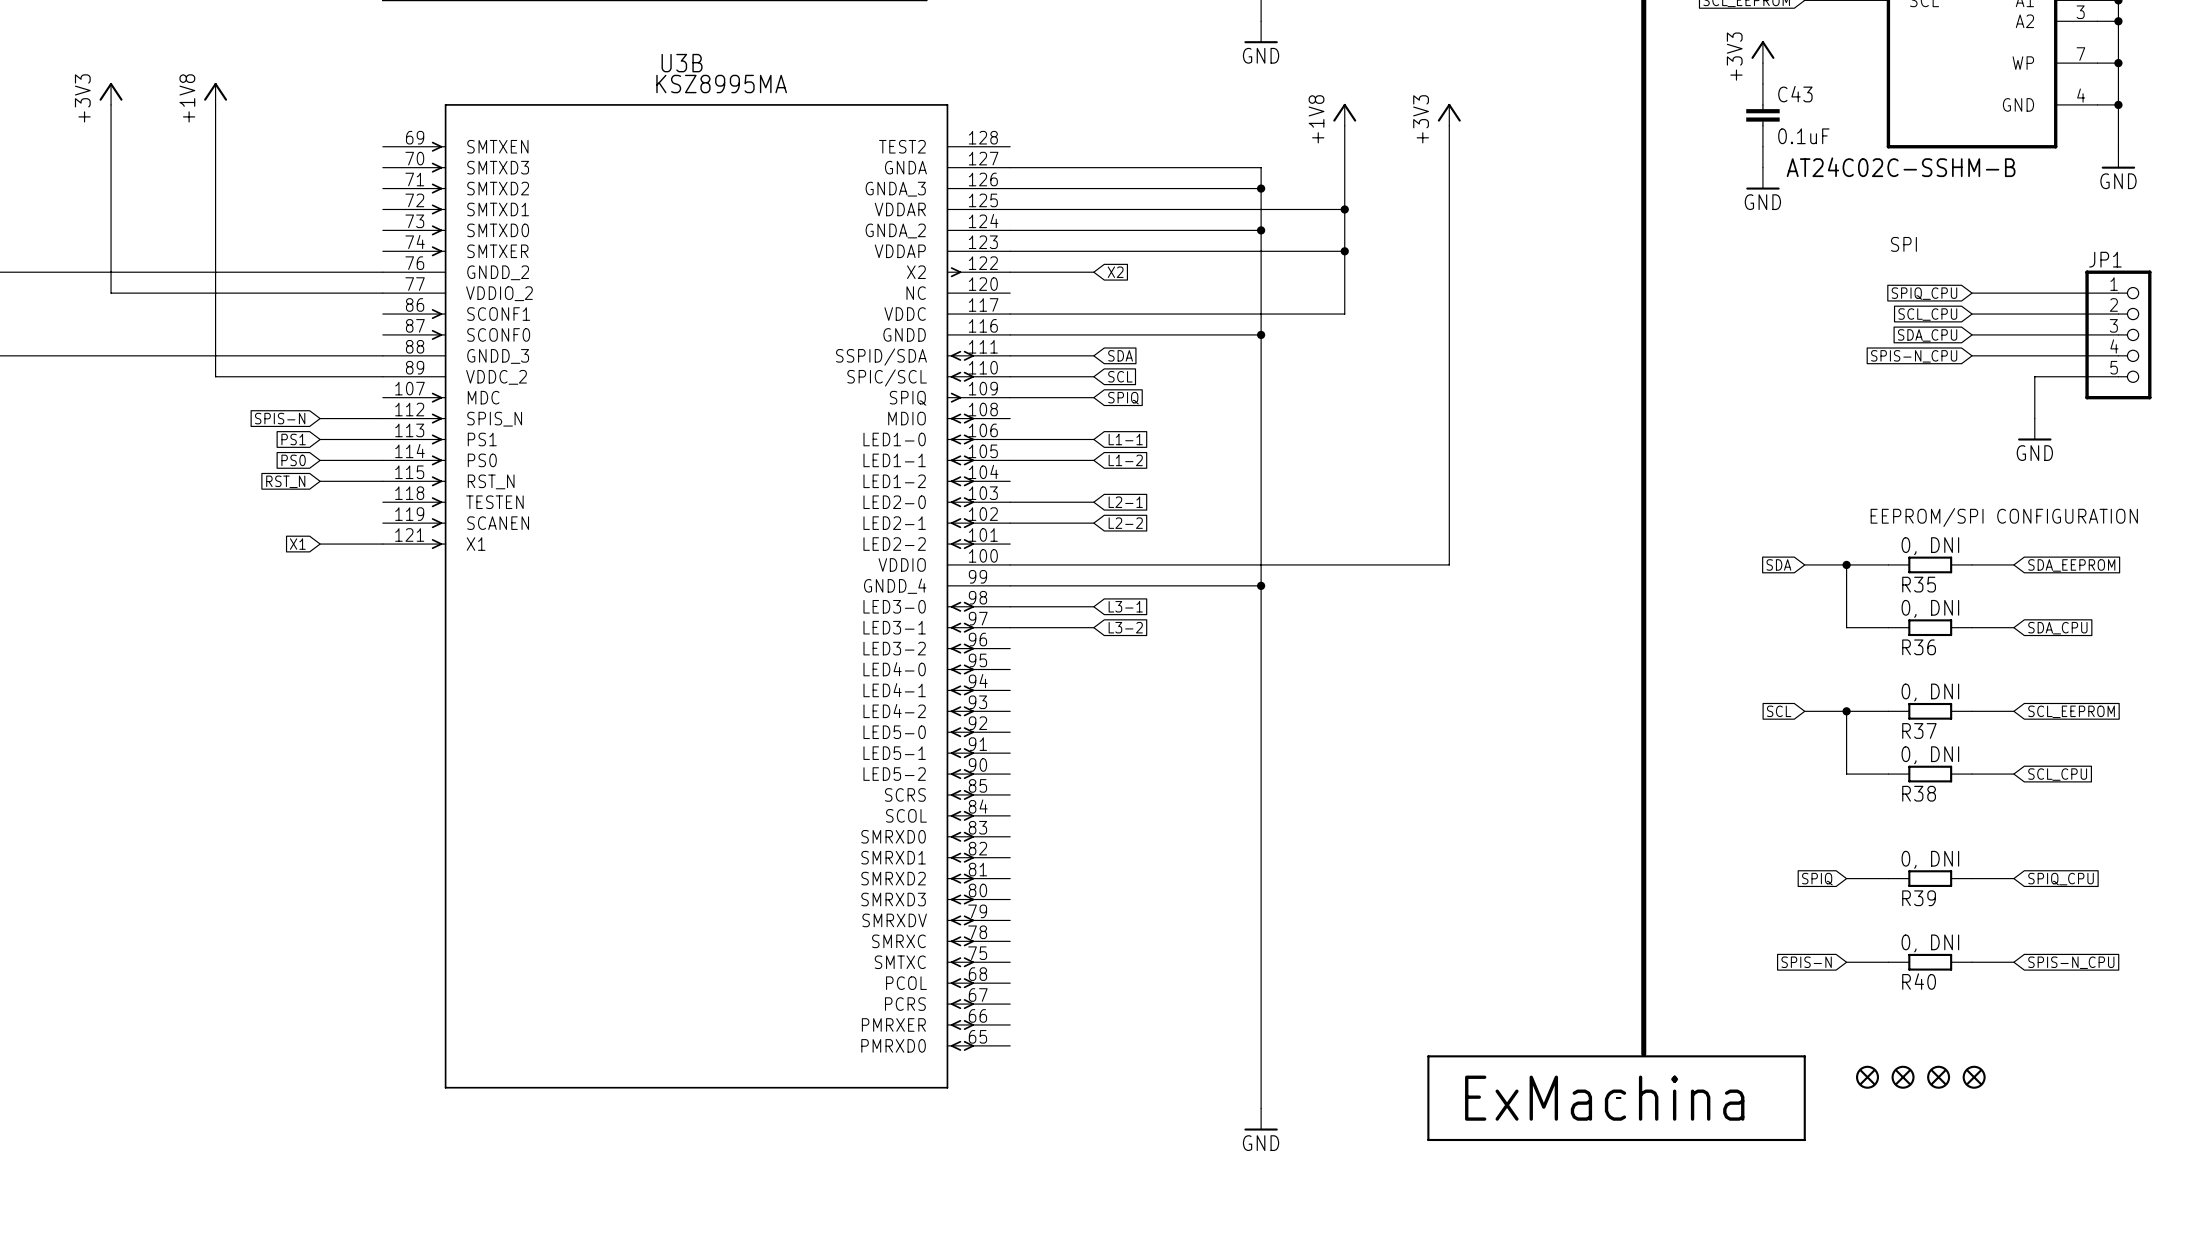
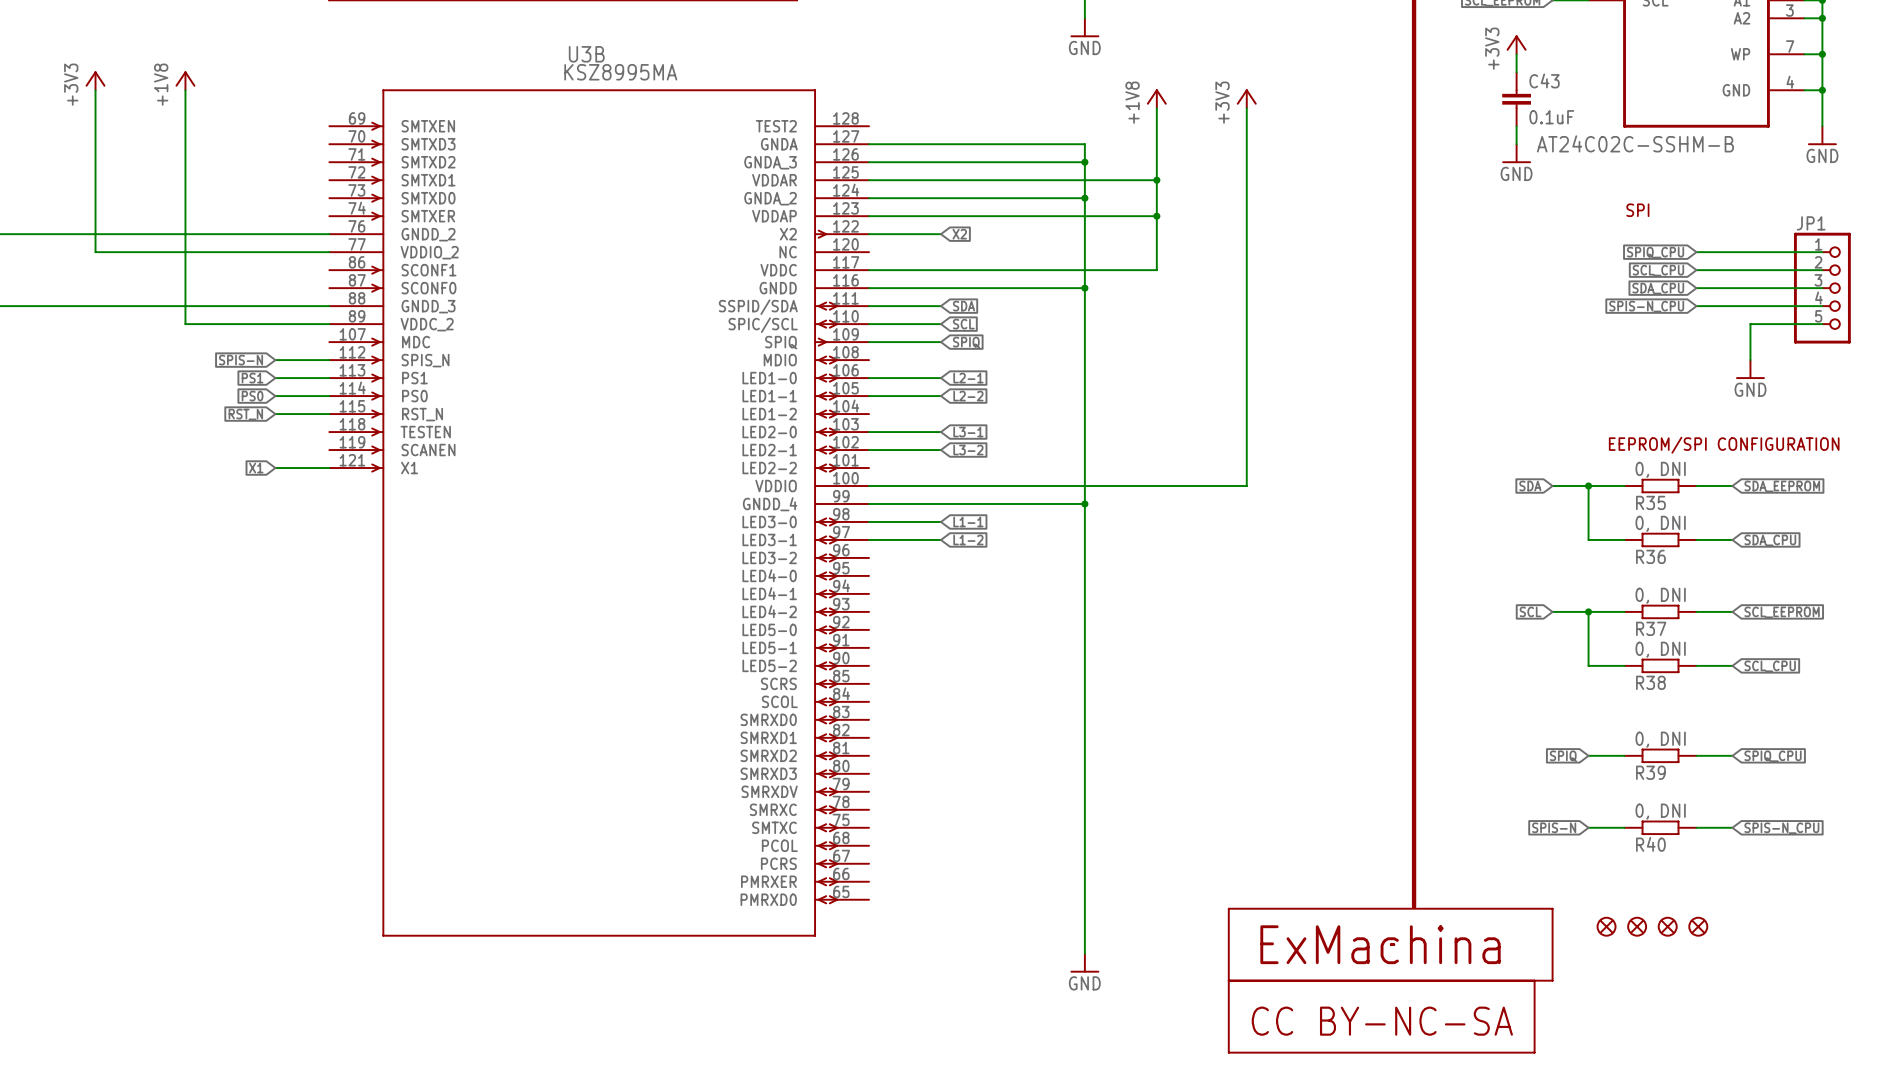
global label: L1-1 (1125, 439) -> L2-1 (968, 378)
global label: L1-2 (1125, 460) -> L2-2 (968, 396)
global label: L2-1 (1125, 502) -> L3-1 (968, 432)
global label: L2-2 (1125, 523) -> L3-2 (968, 450)
global label: L3-1 (1125, 606) -> L1-1 (968, 521)
global label: L3-2 (1125, 627) -> L1-2 (968, 539)
part: none -> (1381, 1016)

